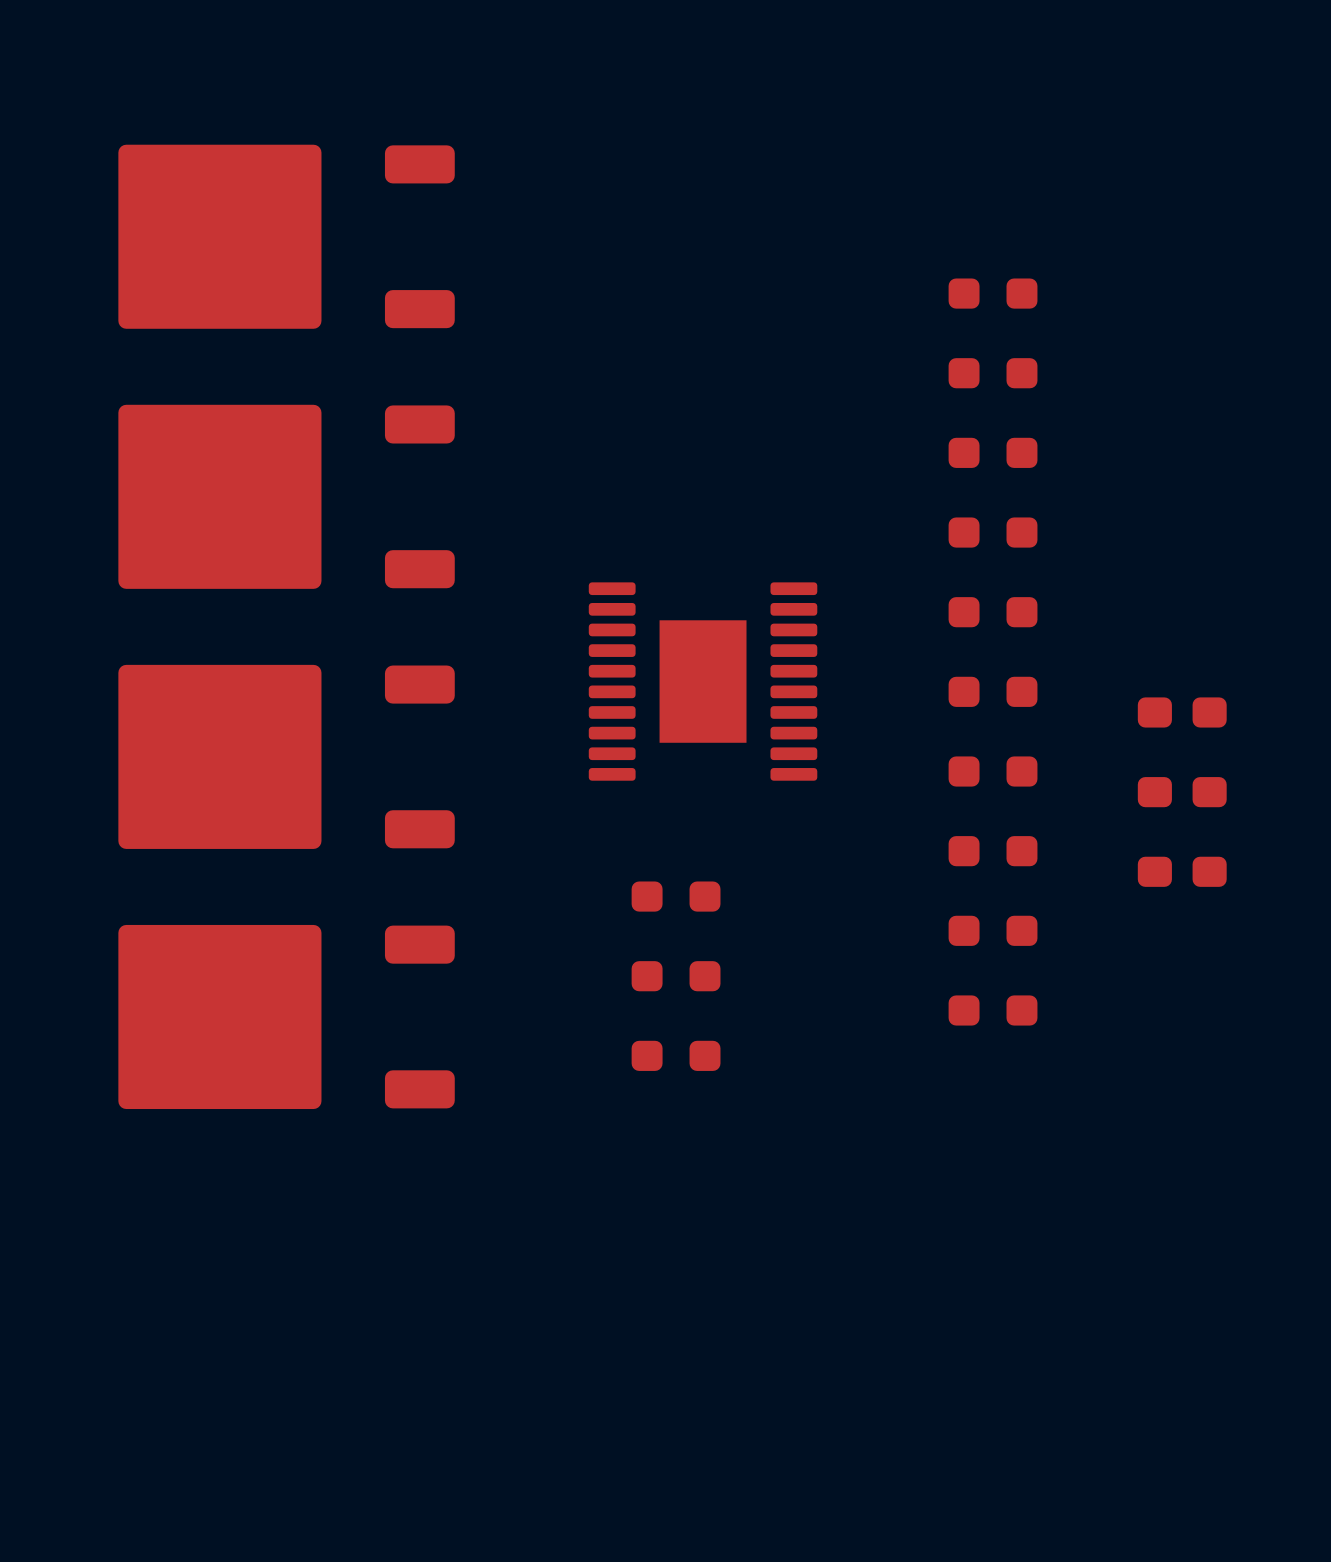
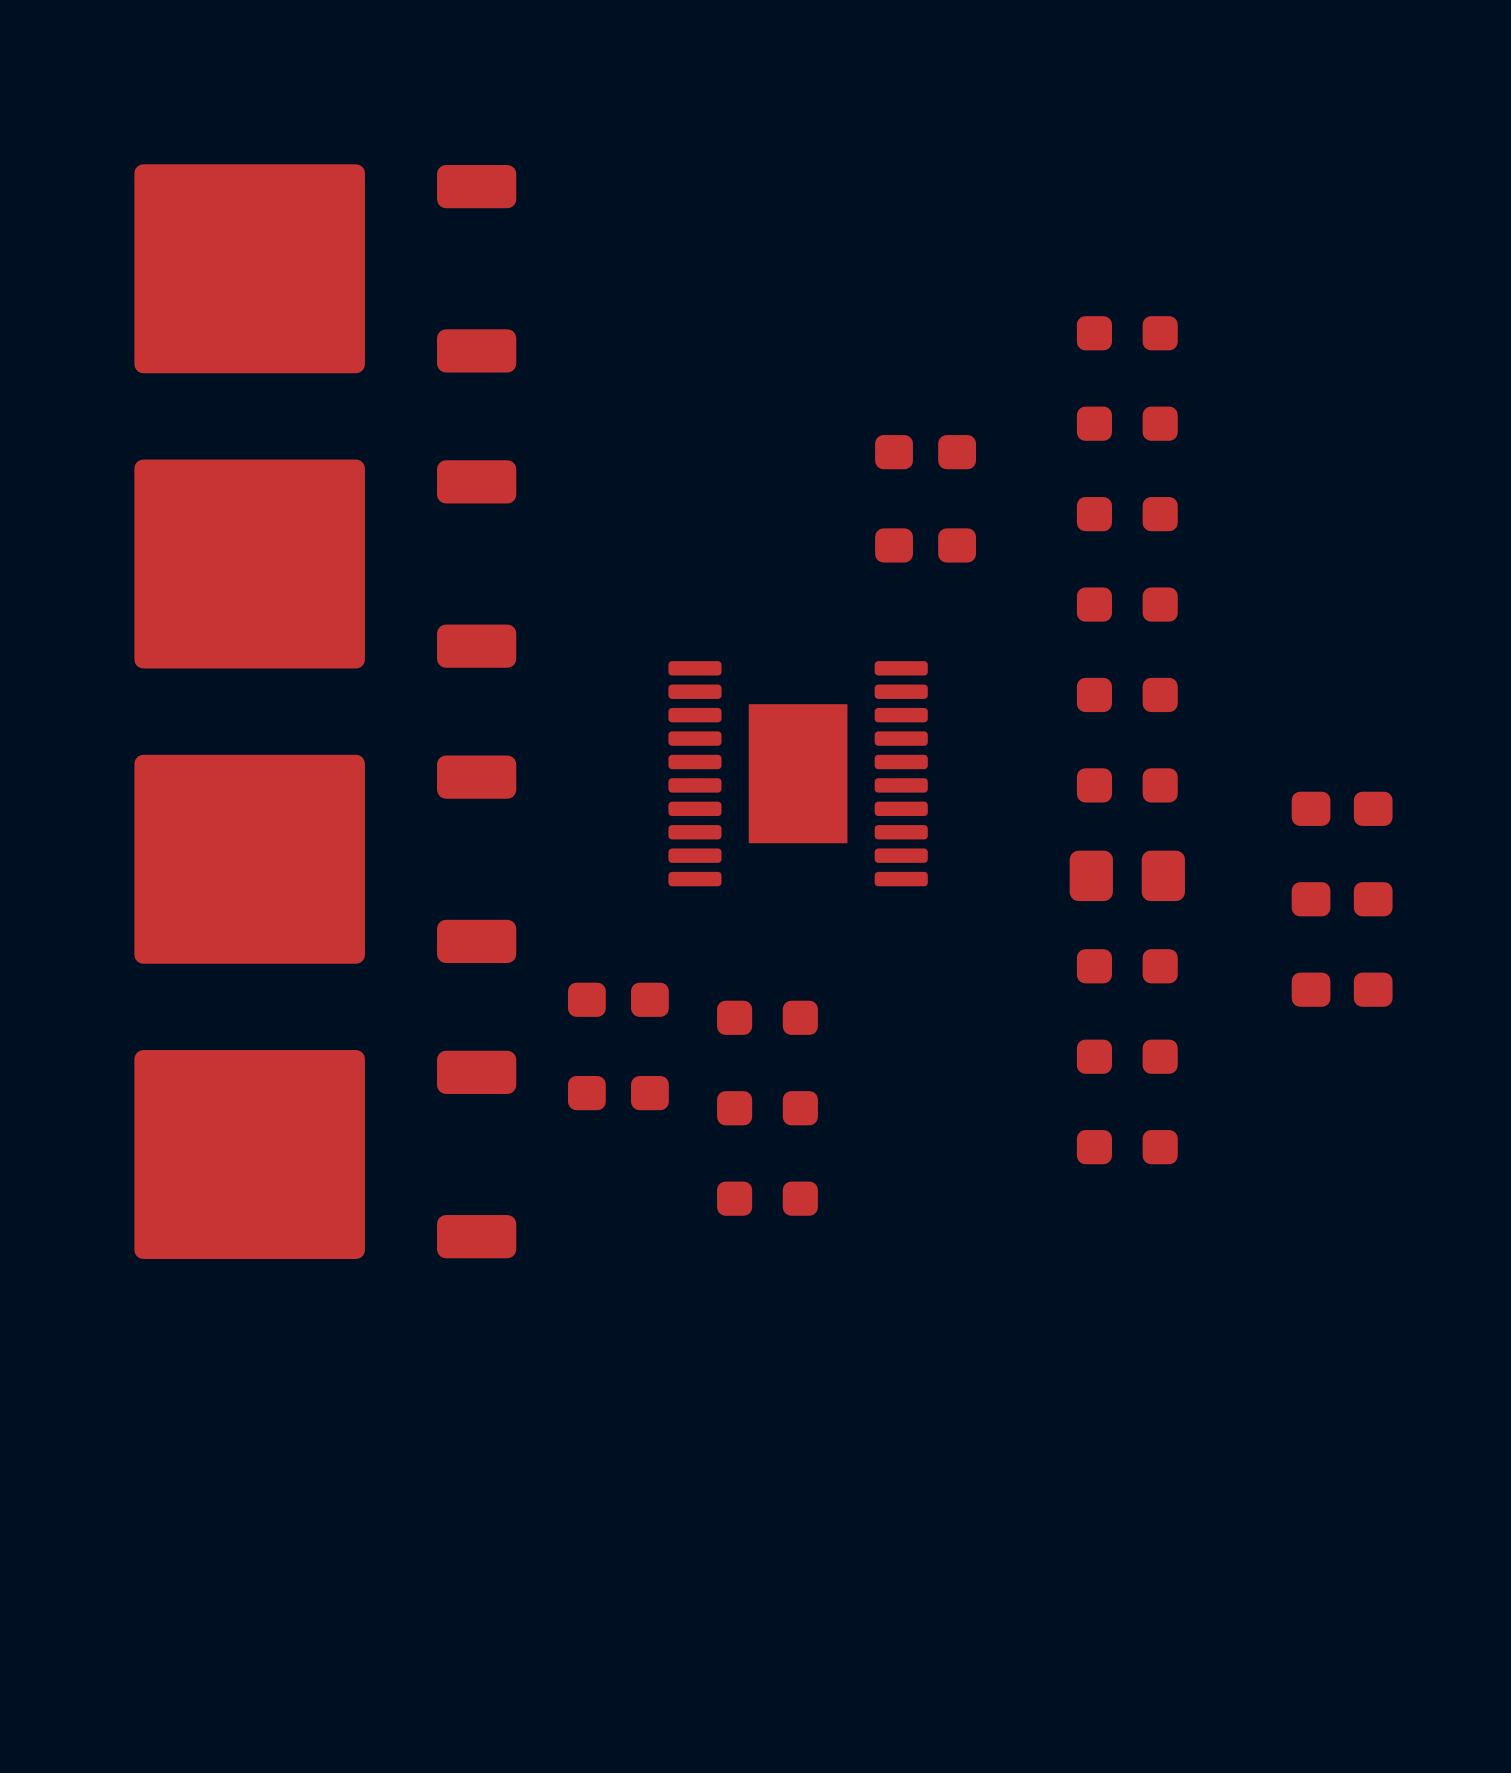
part: none -> (925, 452)
part: none -> (925, 545)
part footprint: [948, 756, 1038, 787] -> [1069, 850, 1185, 902]
part: none -> (618, 999)
part: none -> (618, 1093)

